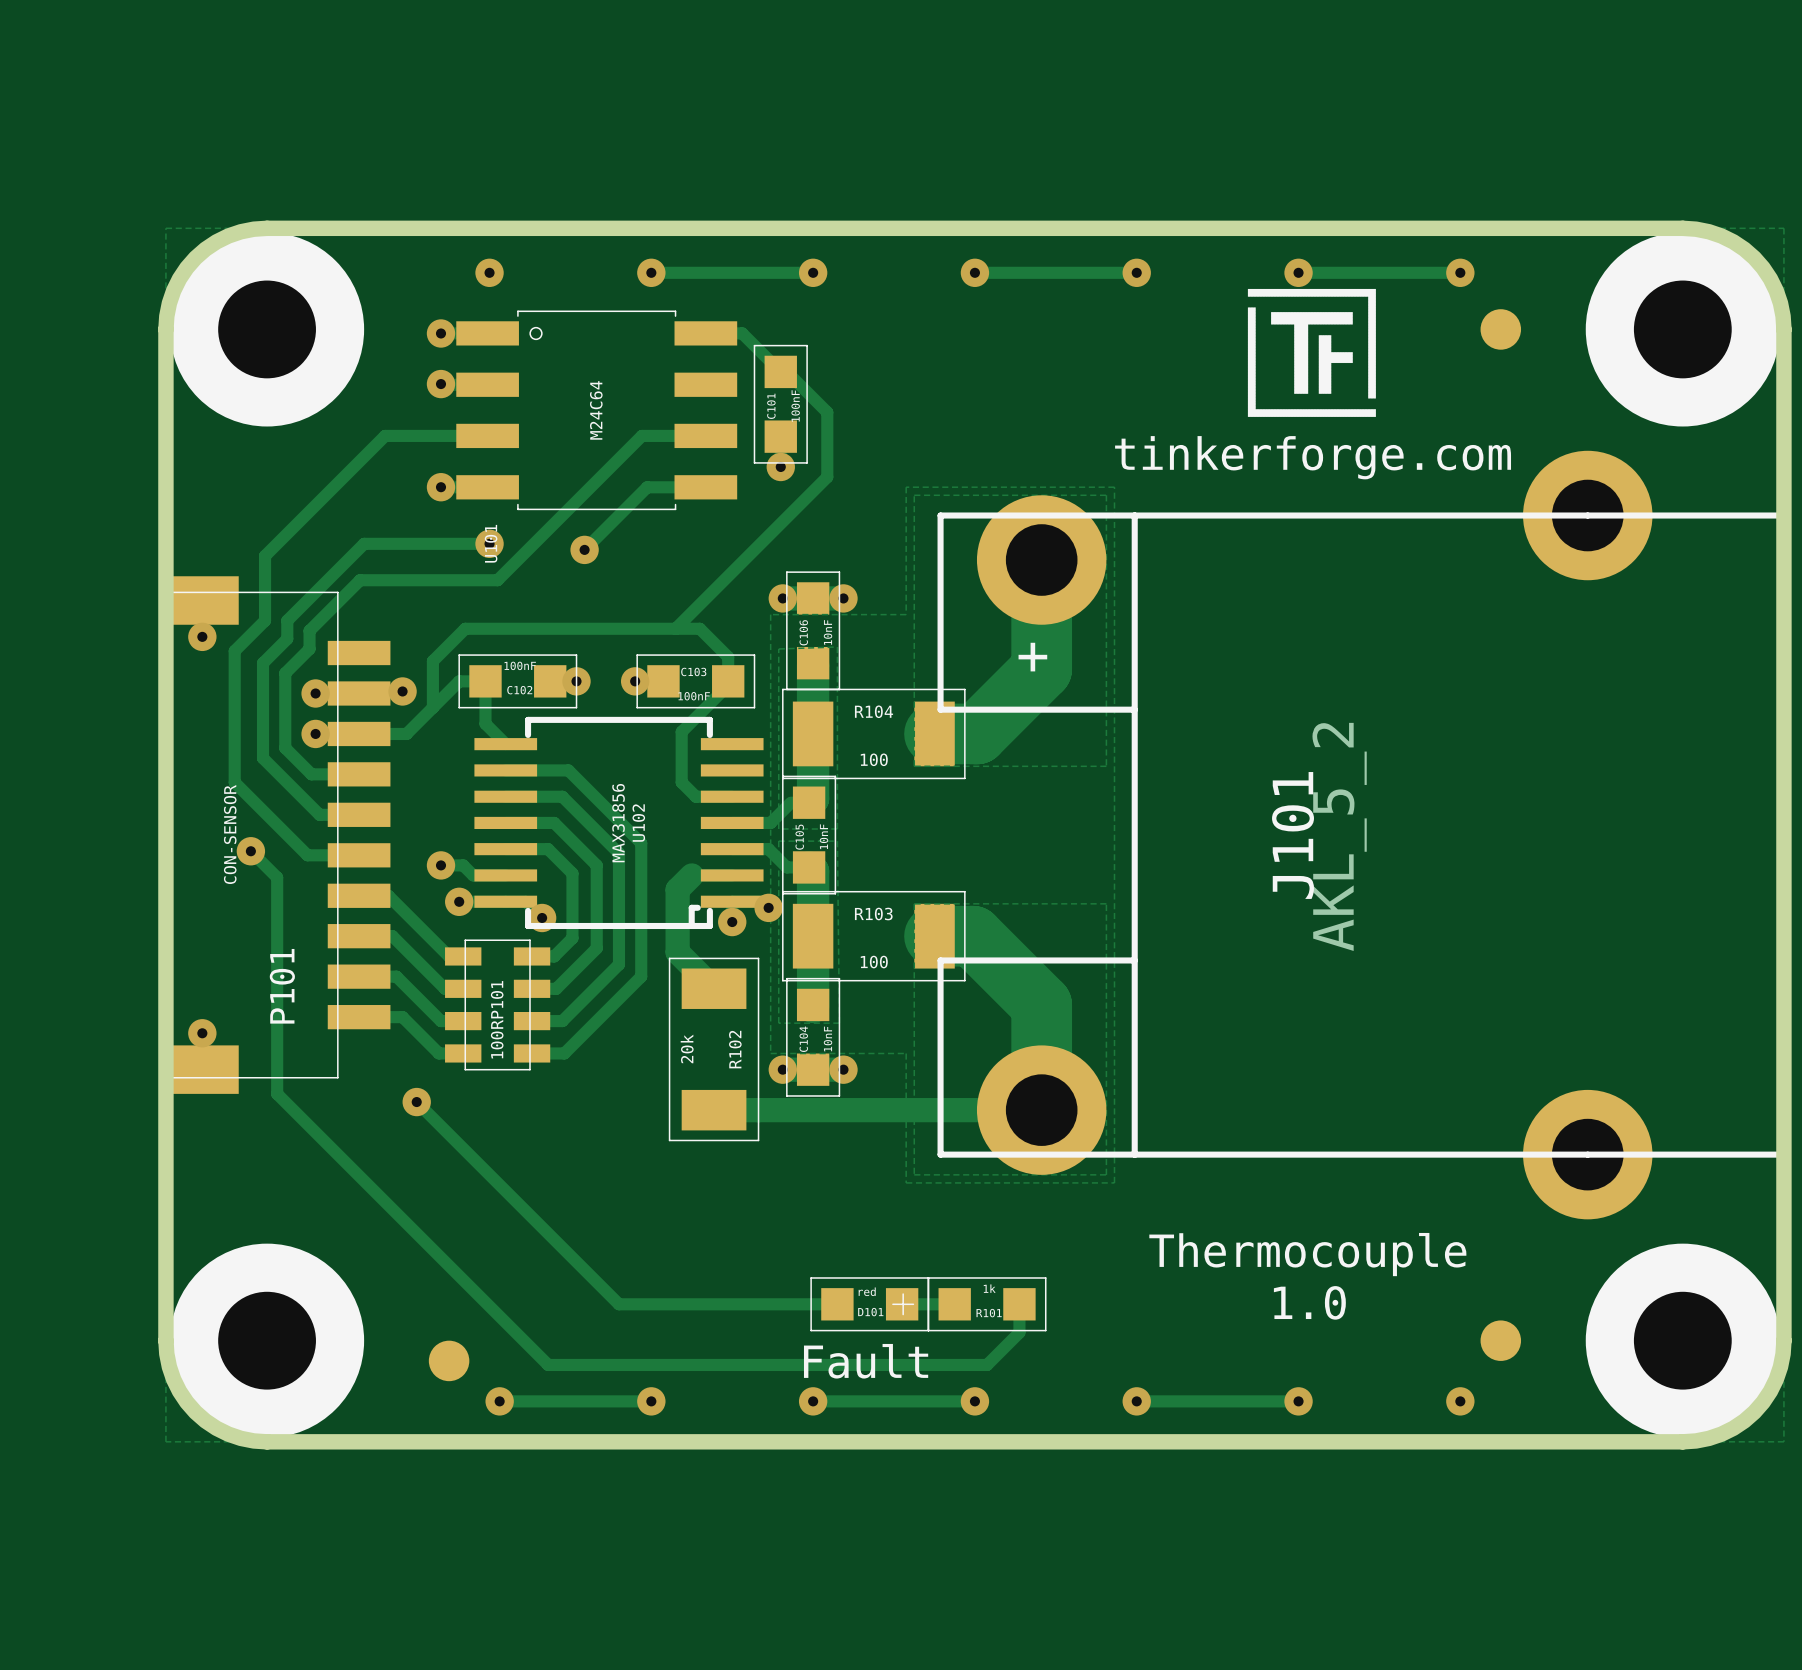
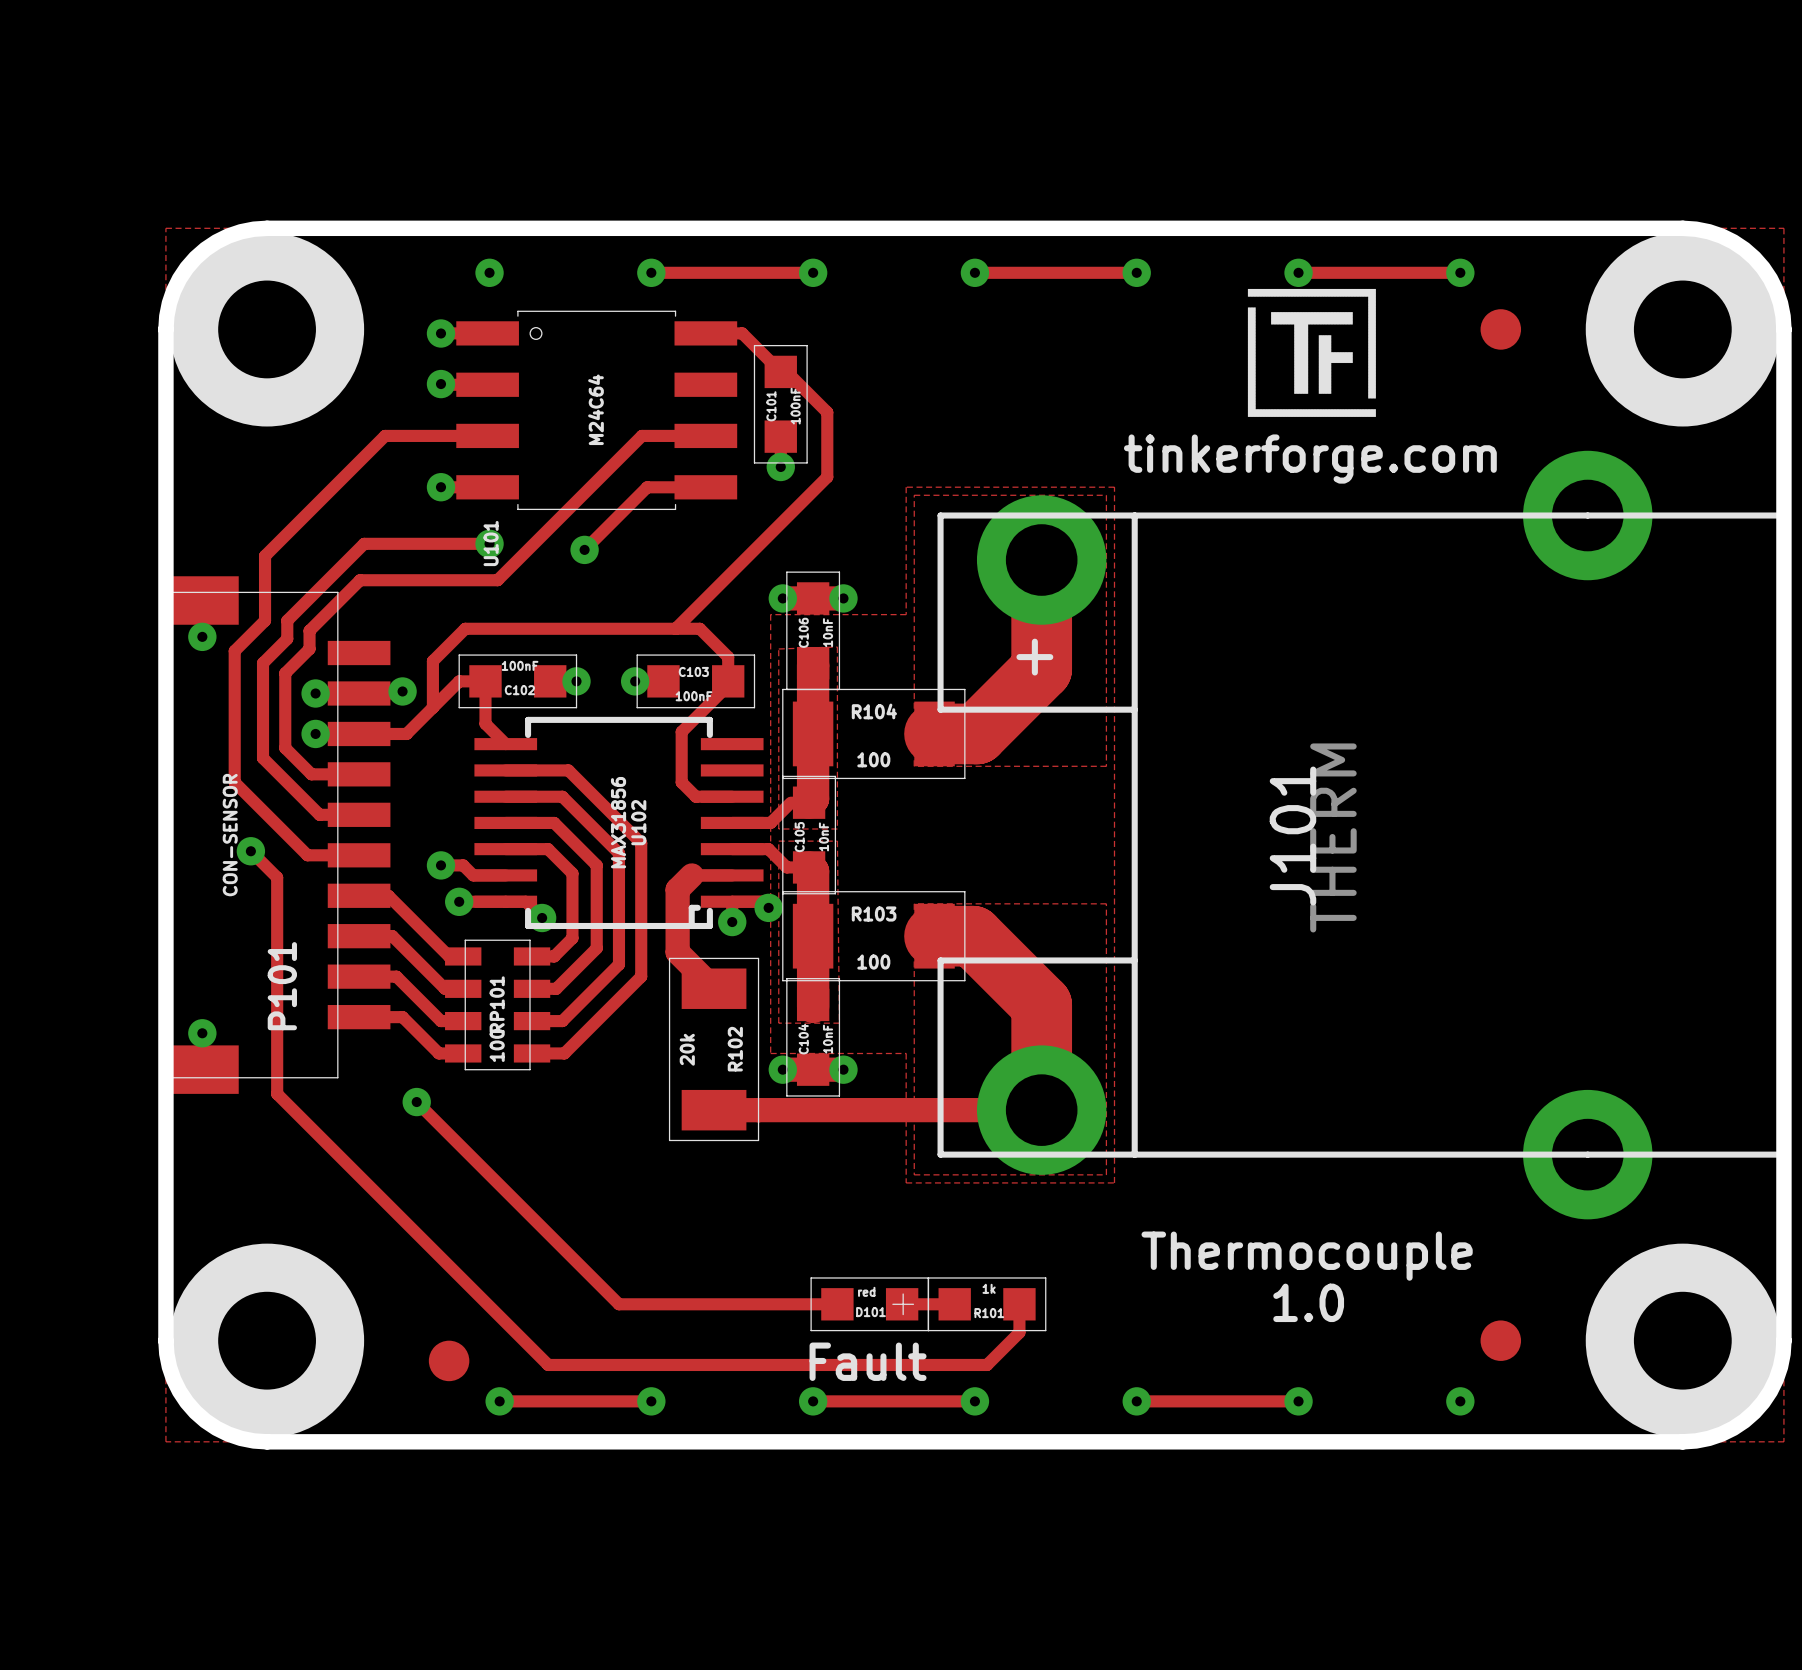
J101 value: AKL_5_2 (1339, 836) -> THERM (1333, 837)

